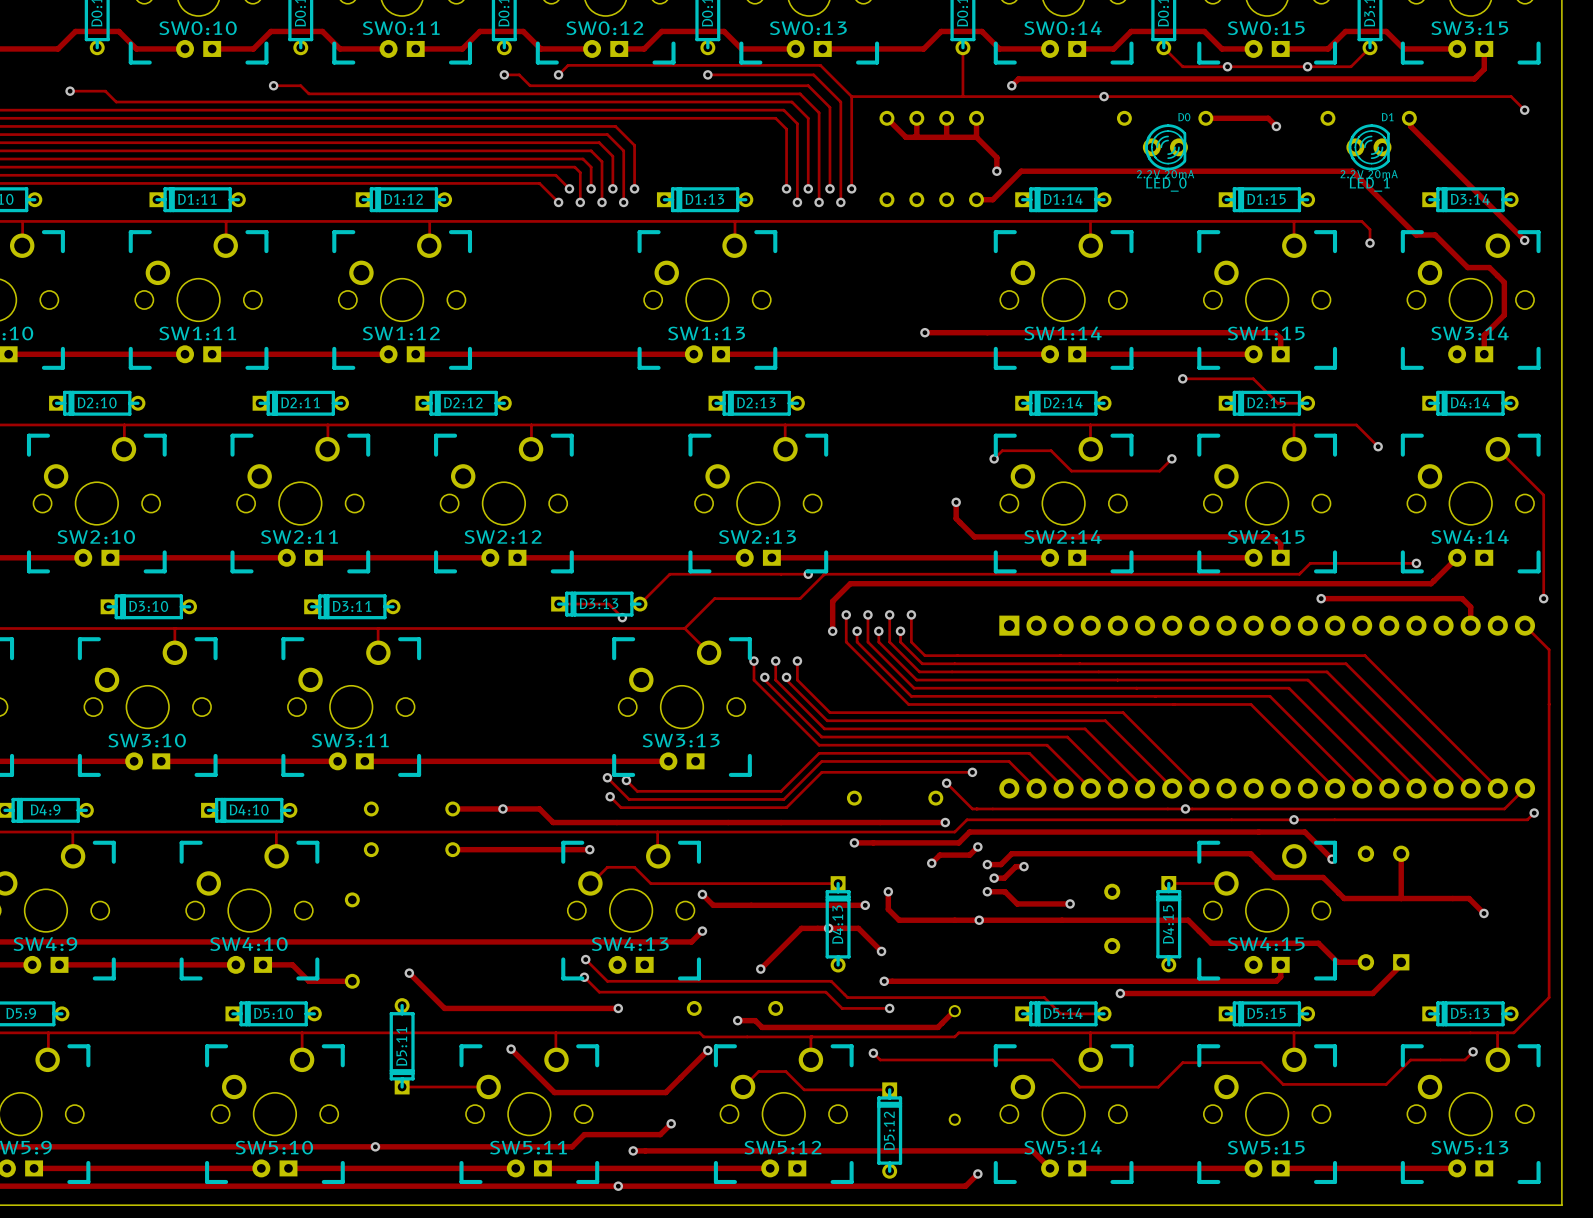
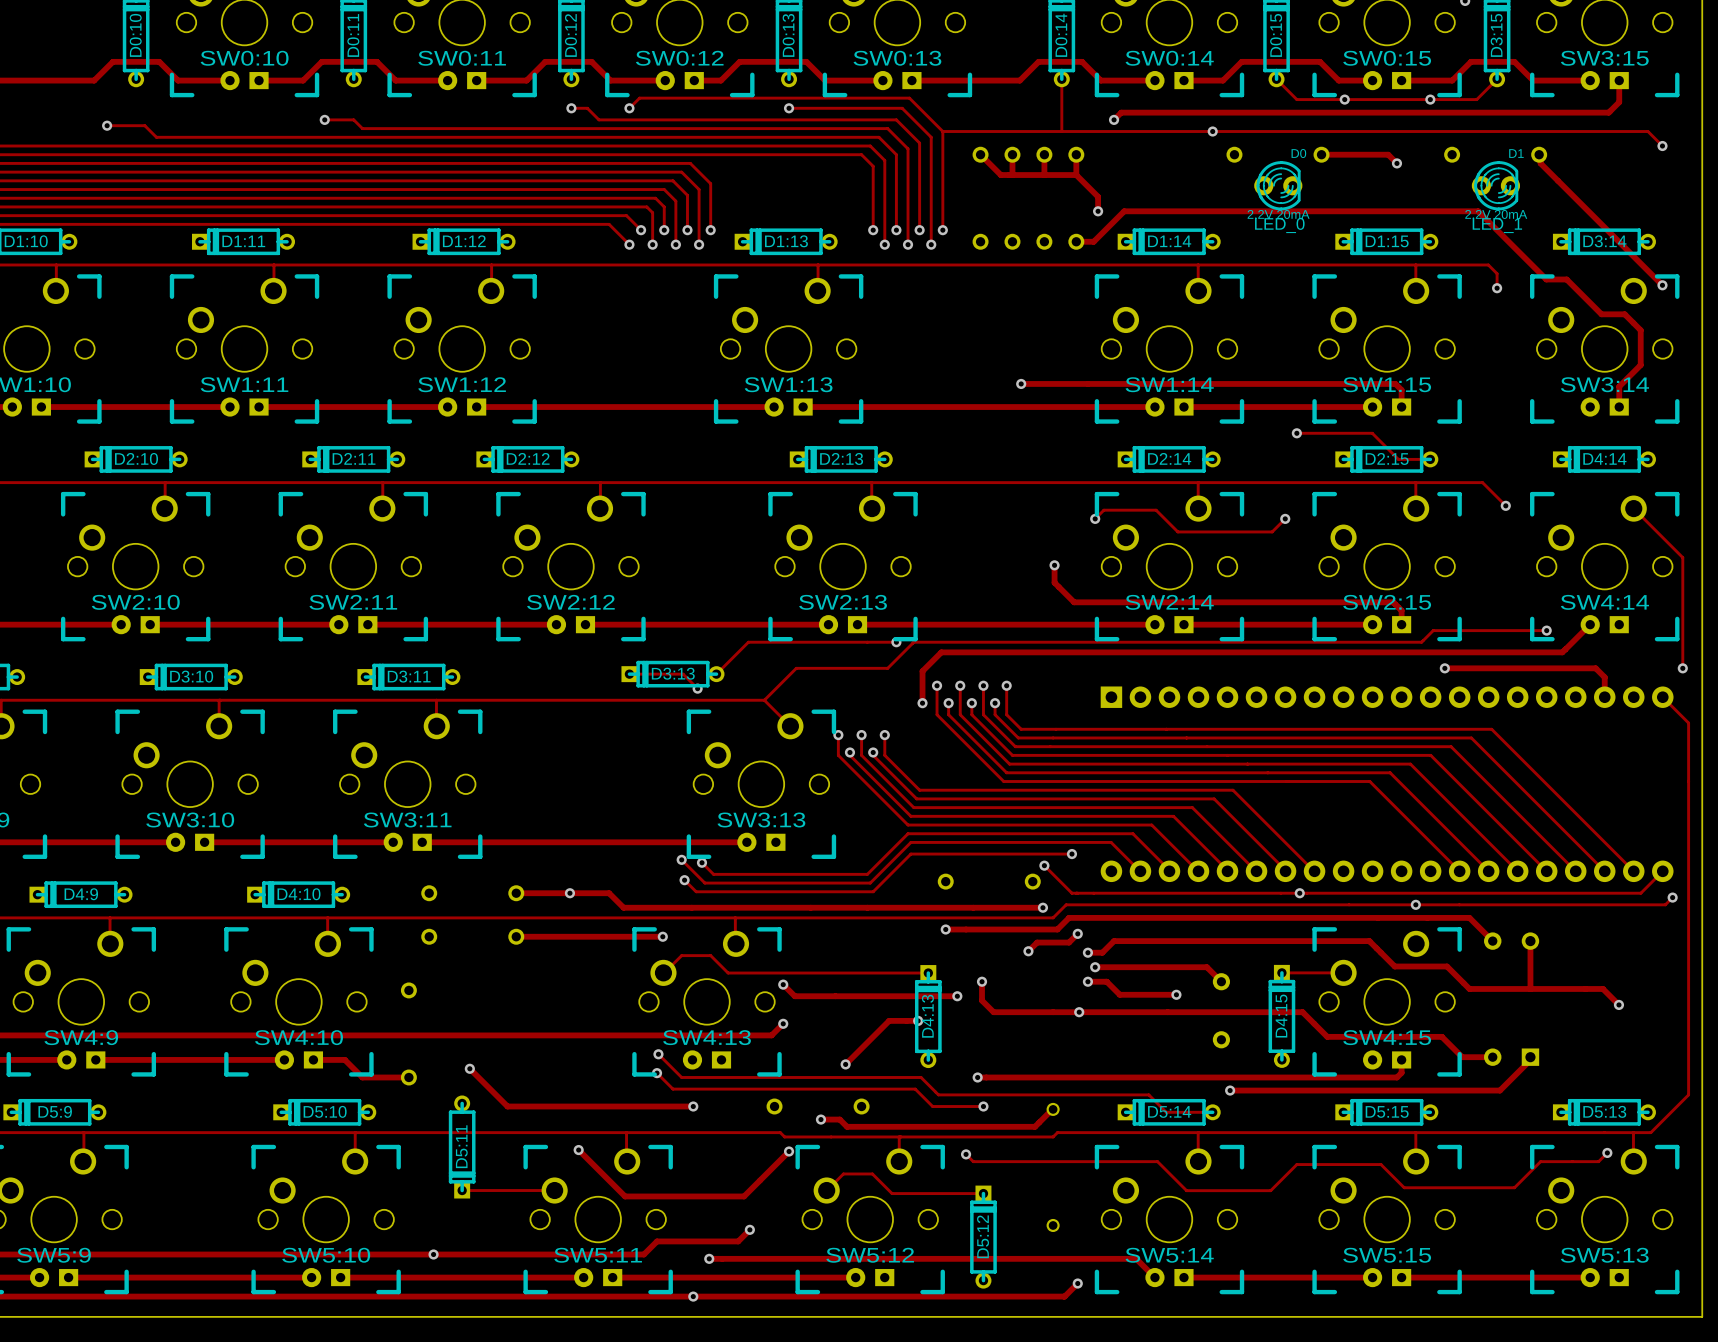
track: (1304, 832) (1332, 859) -> (1427, 917) (1469, 917) (1492, 941)
via: (1332, 859) -> none
track: (1024, 866) (1015, 866) (1004, 878) -> (1221, 981) (1206, 967) (1106, 967)
via: (1024, 866) -> none
track: (828, 928) (858, 928) (881, 951) -> none
via: (881, 951) -> none

